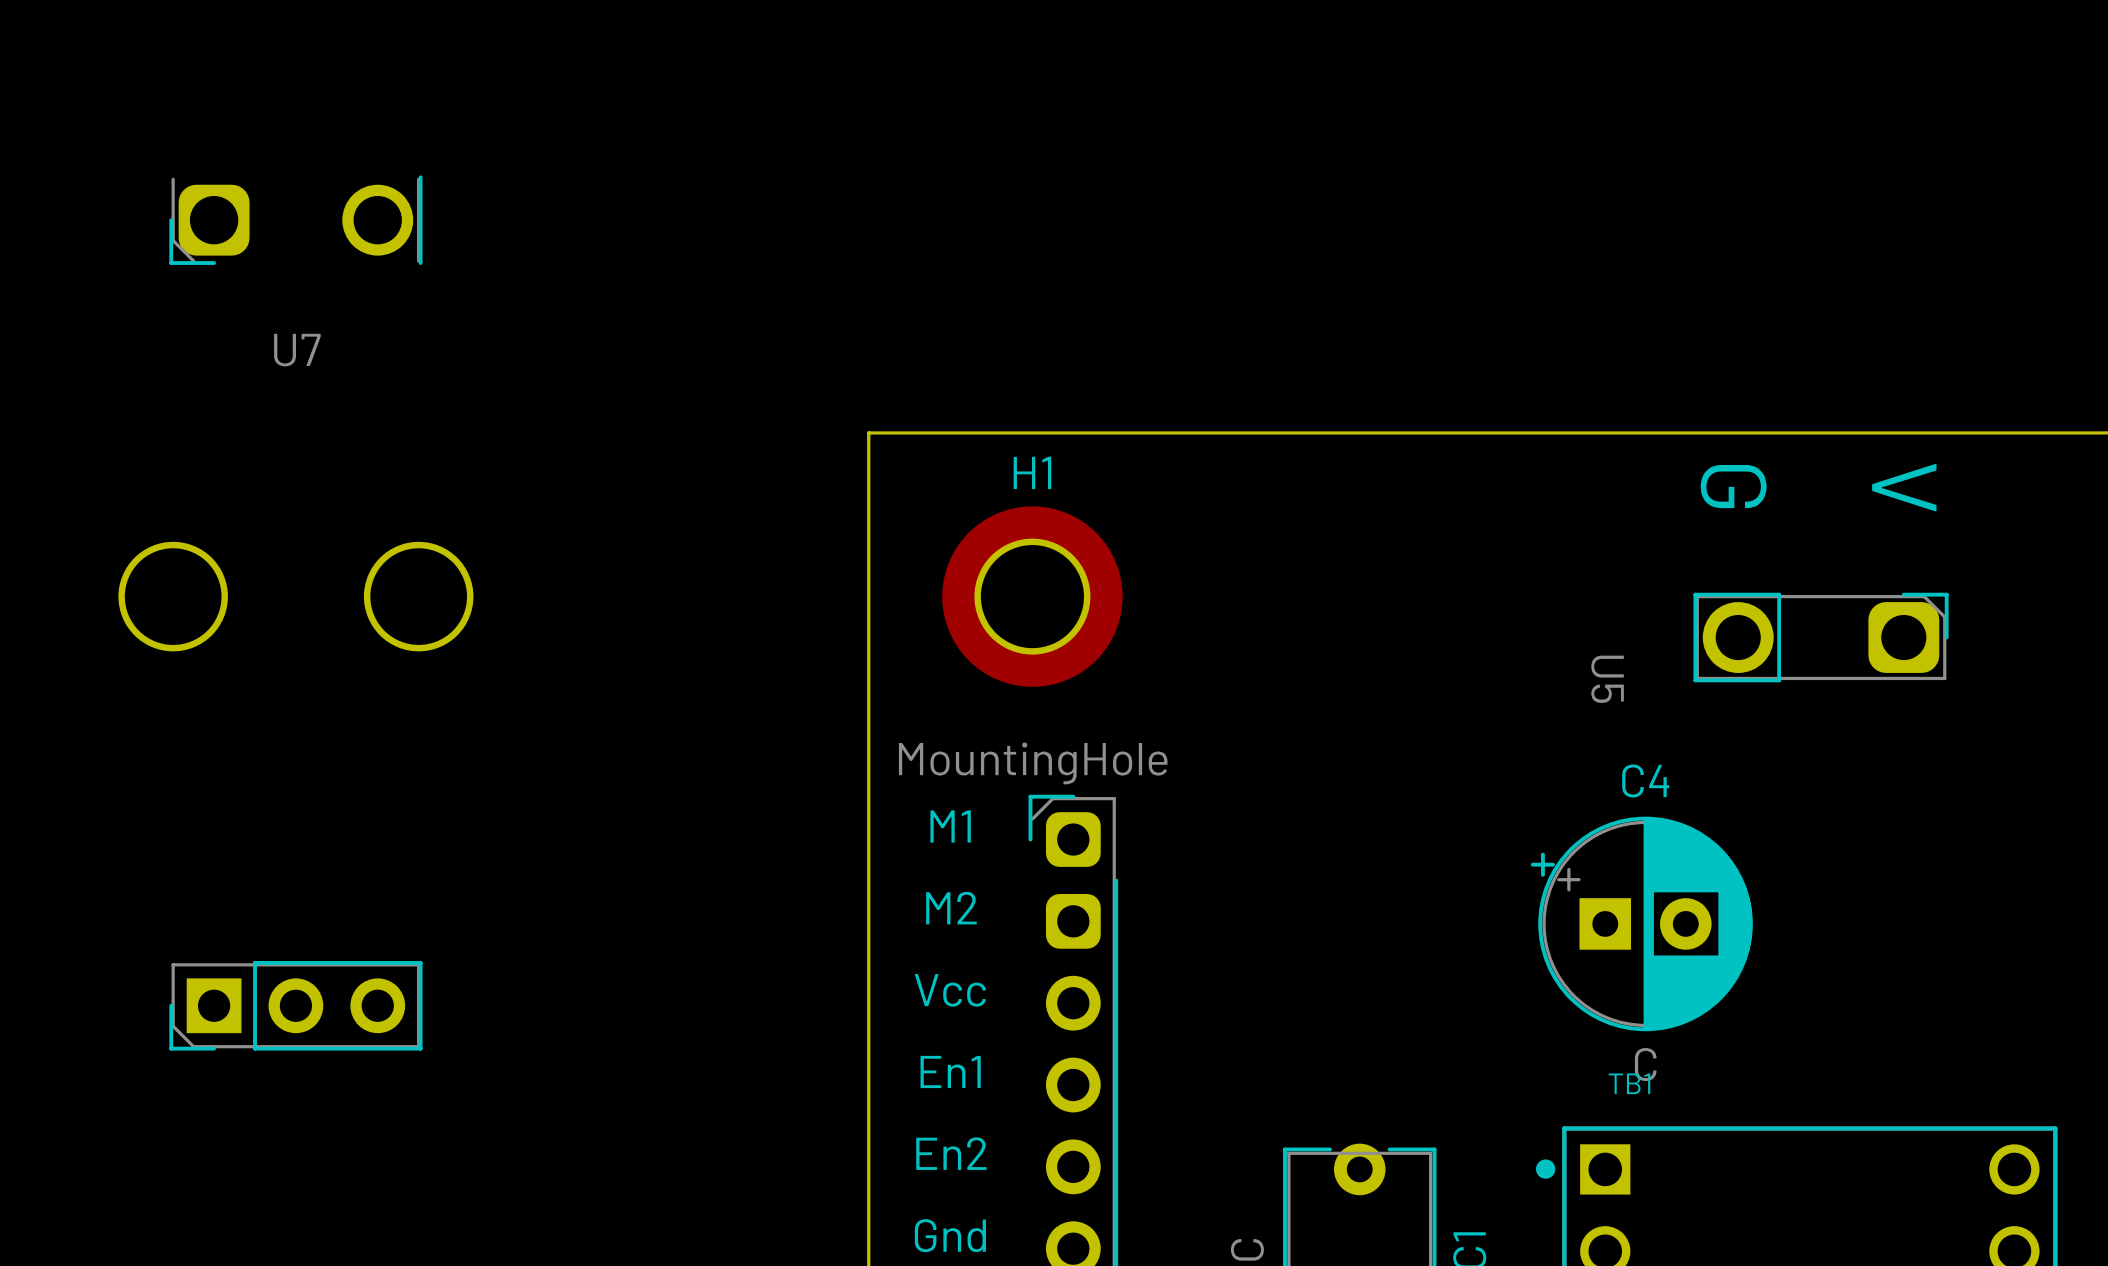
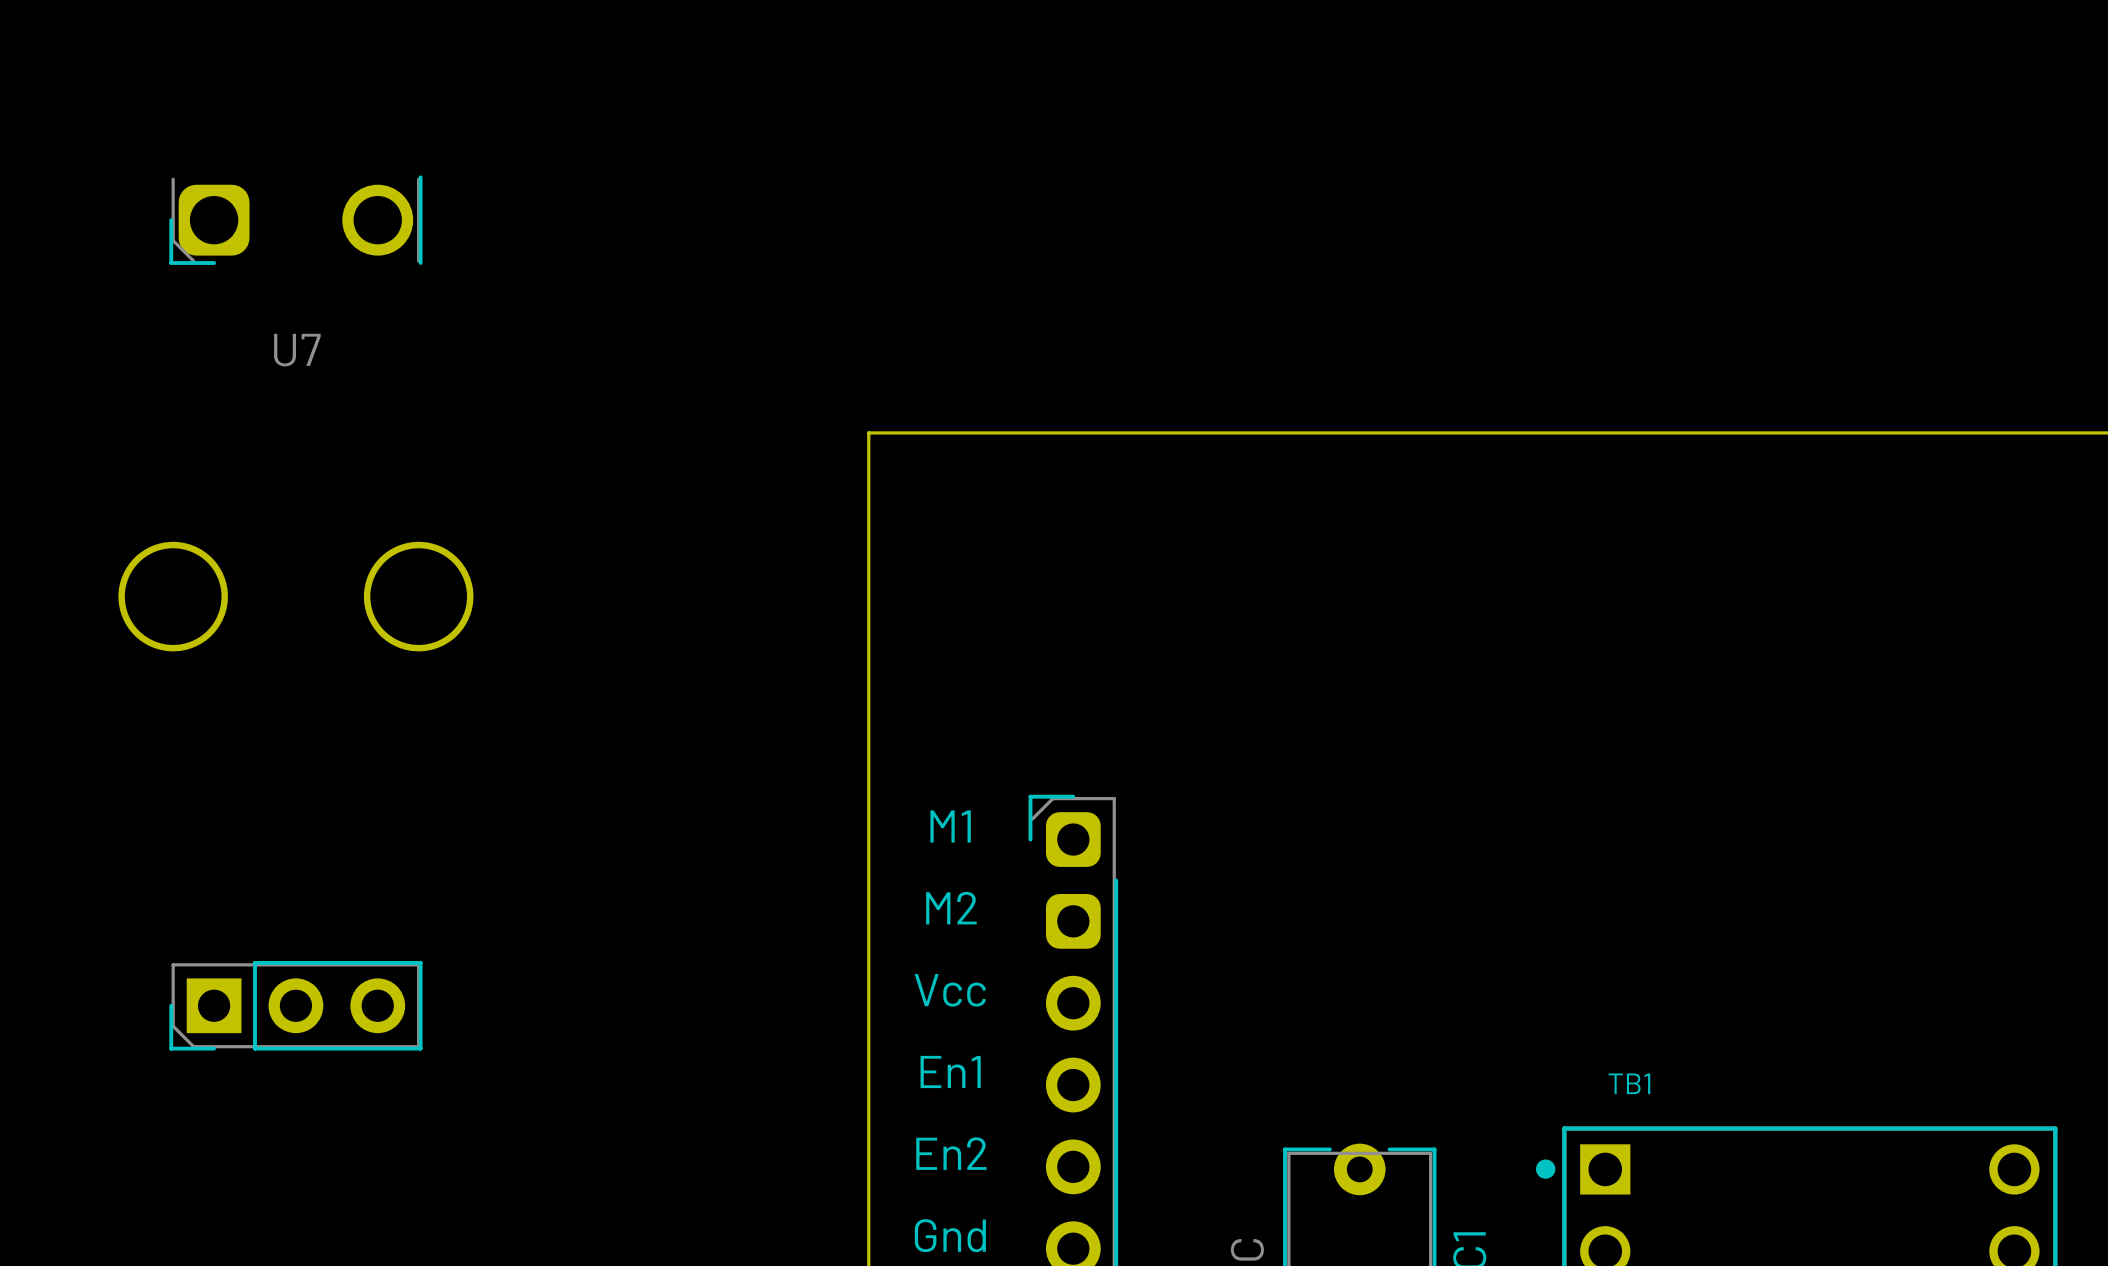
H1: MountingHole (1032, 596) -> none
U5: (1821, 637) -> none
C4: C (1641, 923) -> none

